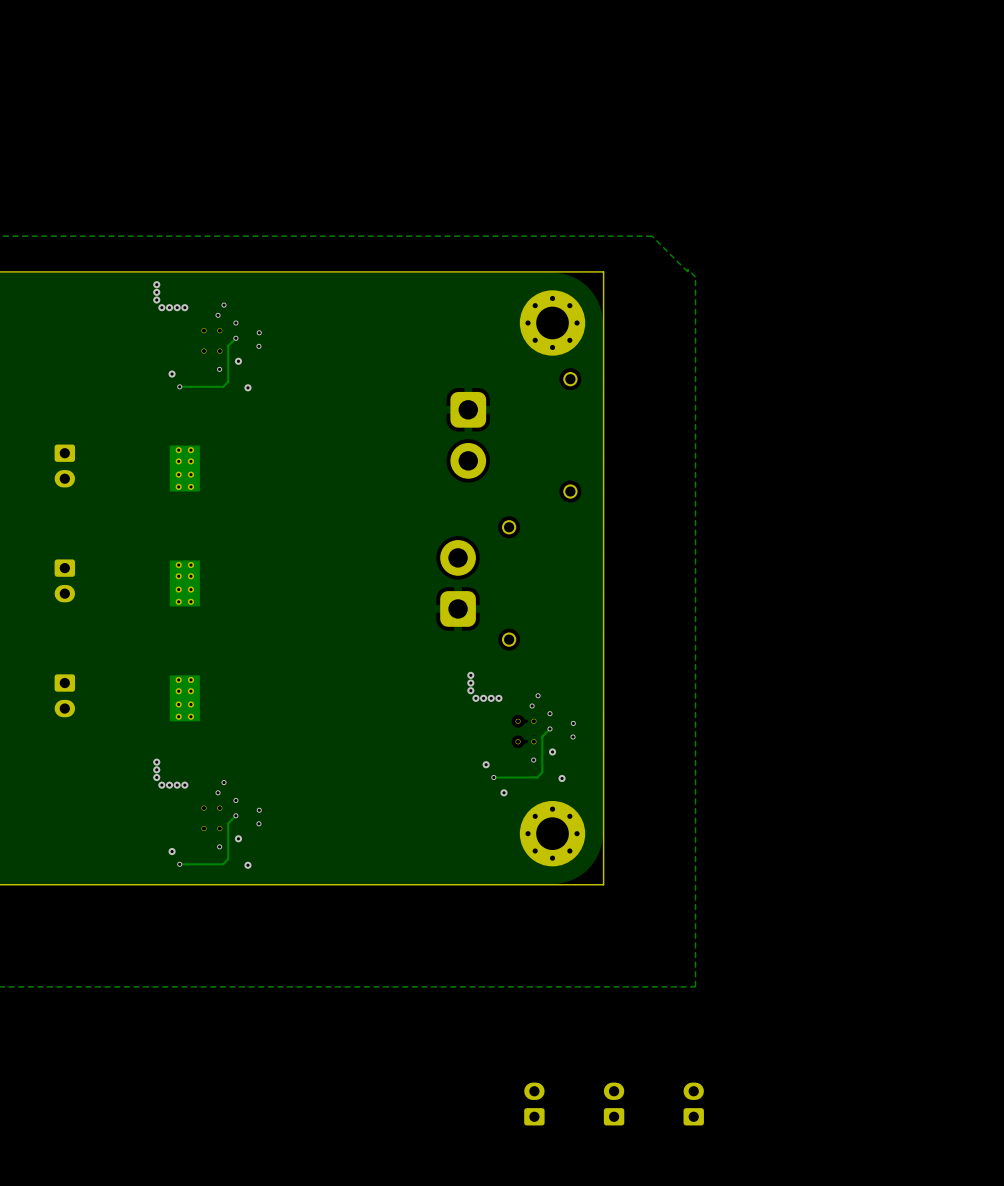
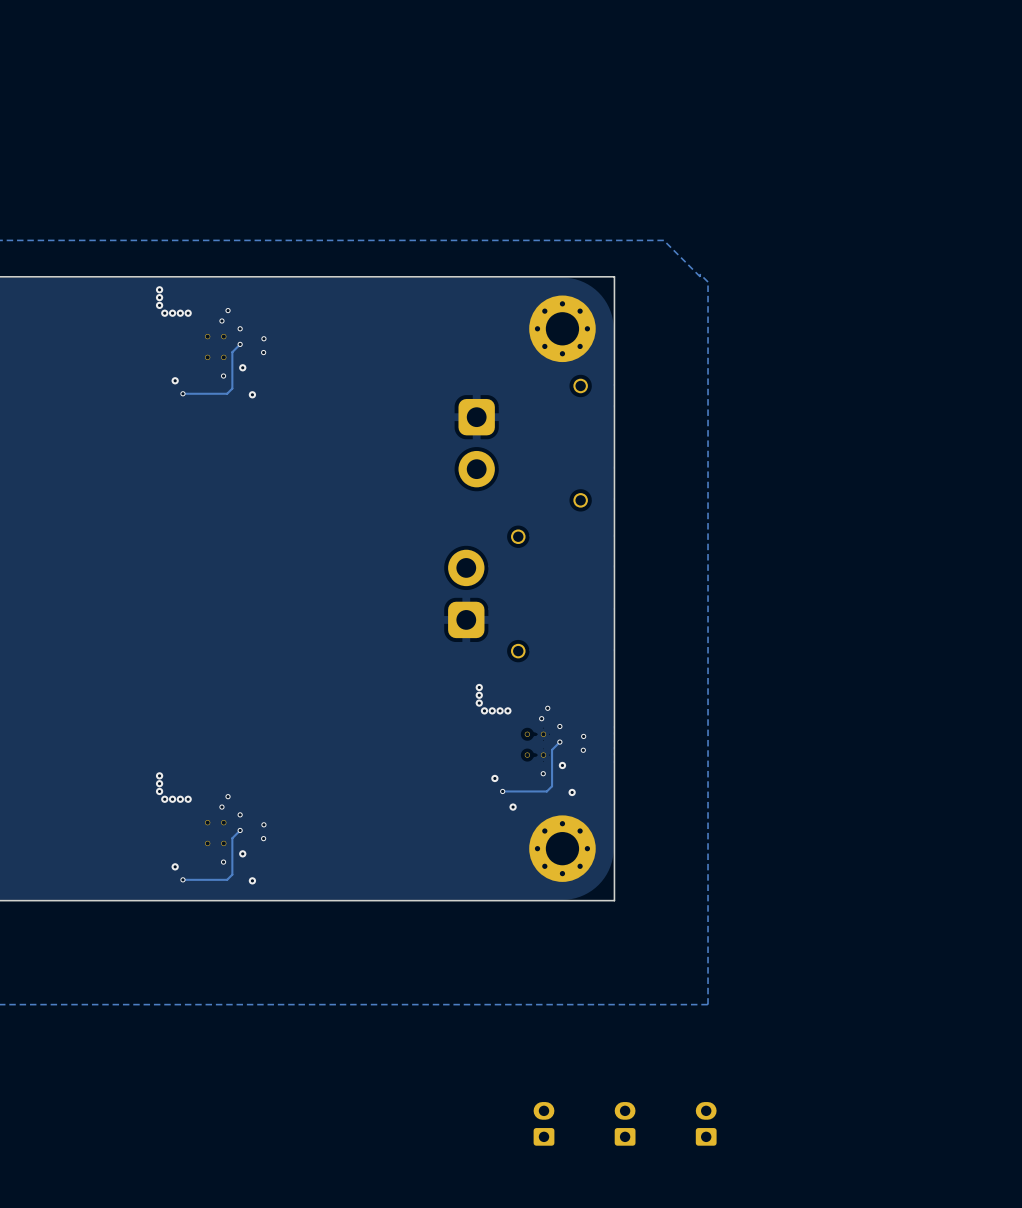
part: (64, 465) -> none
part: (184, 468) -> none
part: (64, 580) -> none
part: (184, 583) -> none
part: (64, 695) -> none
part: (184, 698) -> none

